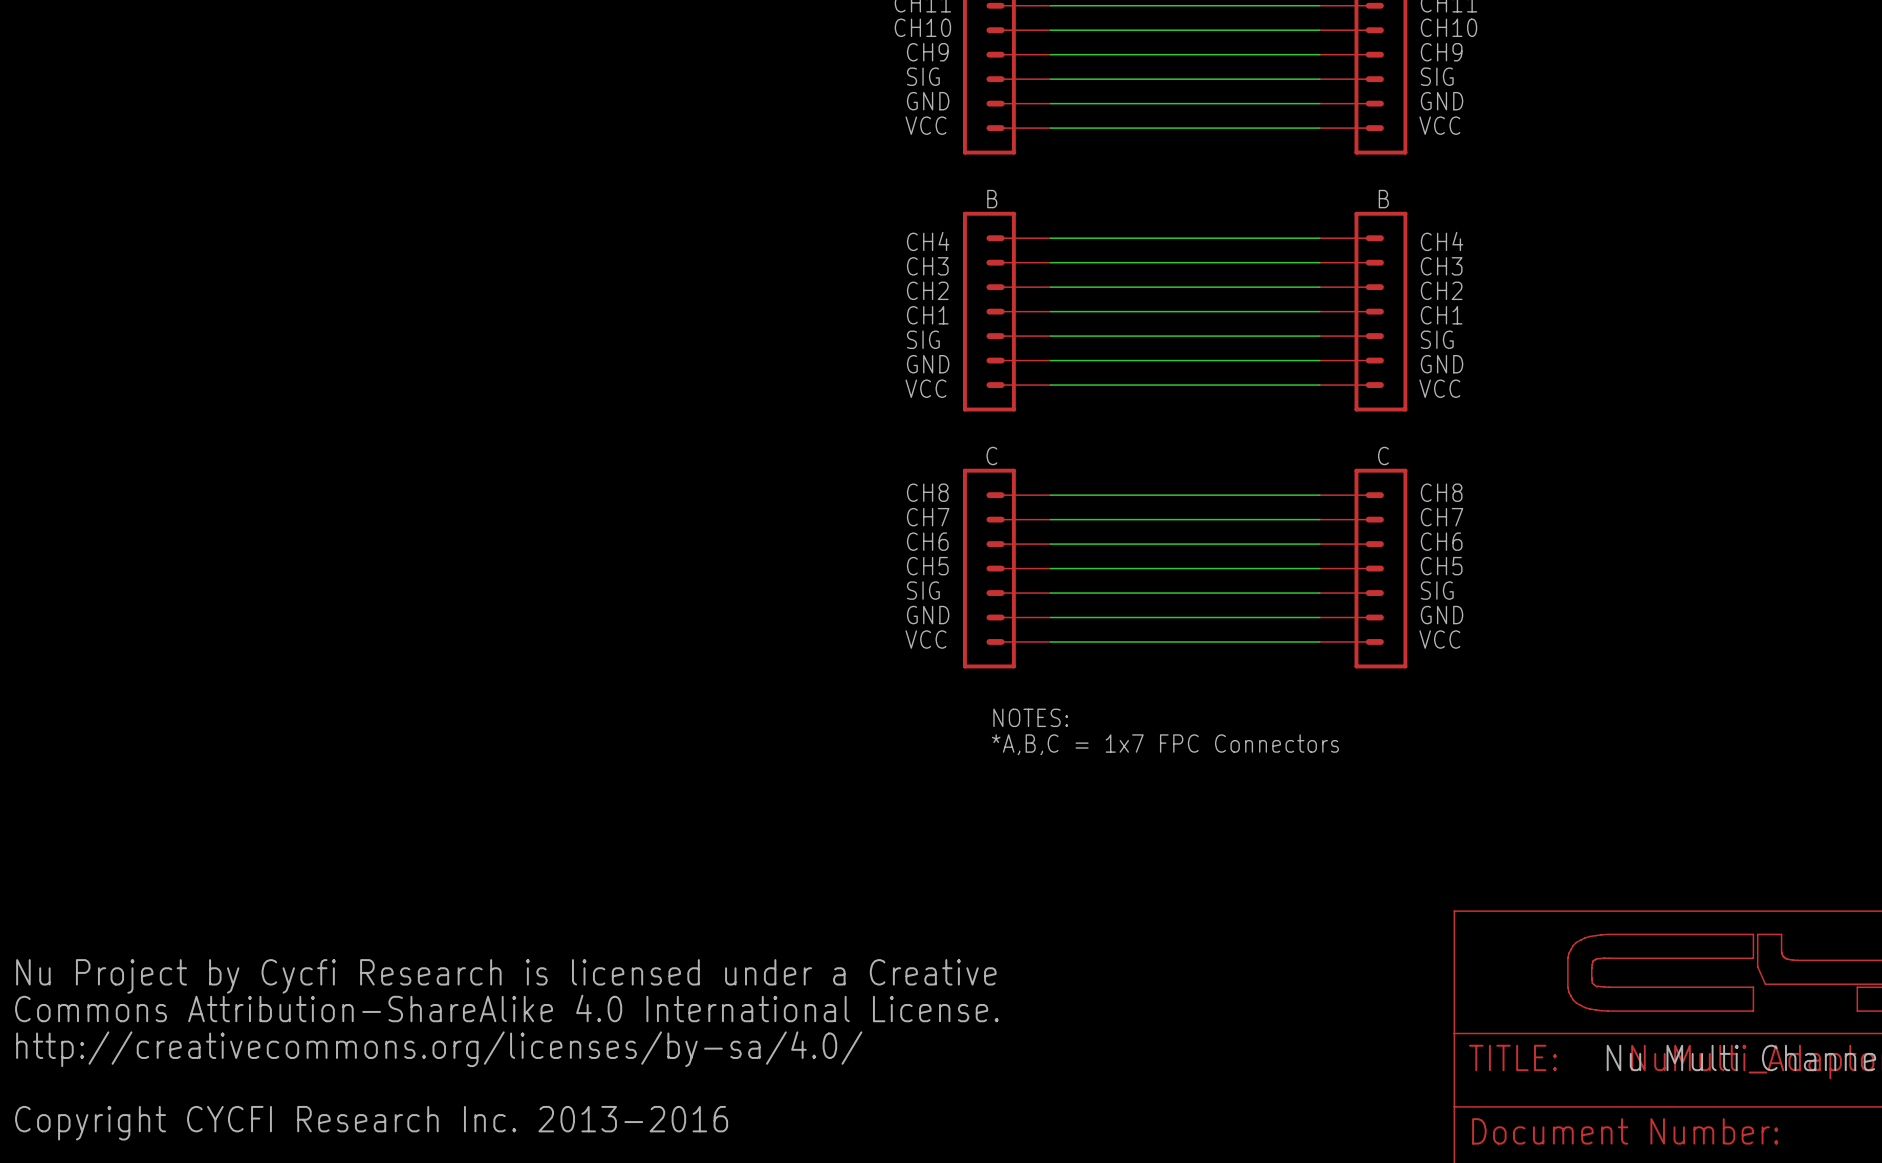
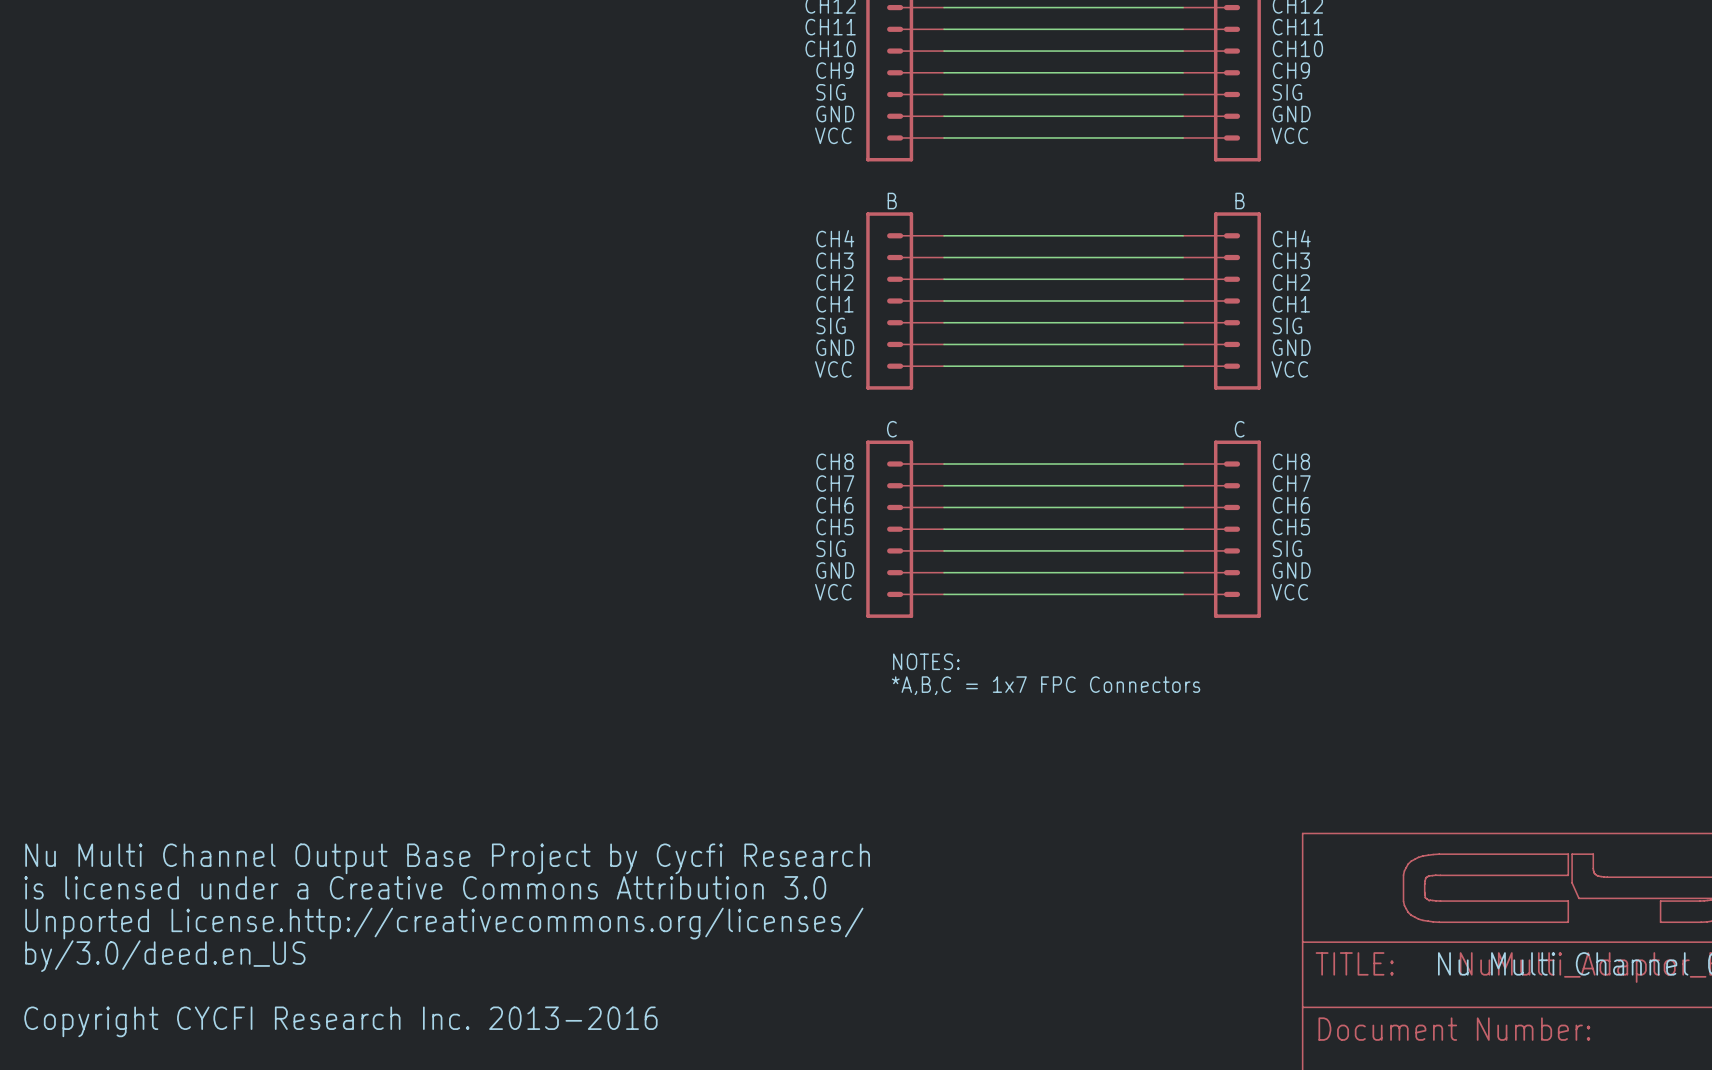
text: none -> Nu Multi Channel Output Base Project by Cycfi Research (447, 858)
text: Nu Project by Cycfi Research is licensed under a Creative (506, 976) -> is licensed under a Creative Commons Attribution 3.0 (425, 887)
text: Commons Attribution-ShareAlike 4.0 International License. (506, 1008) -> Unported License.http://creativecommons.org/licenses/ (444, 923)
text: http://creativecommons.org/licenses/by-sa/4.0/ (439, 1049) -> by/3.0/deed.en_US (165, 956)

